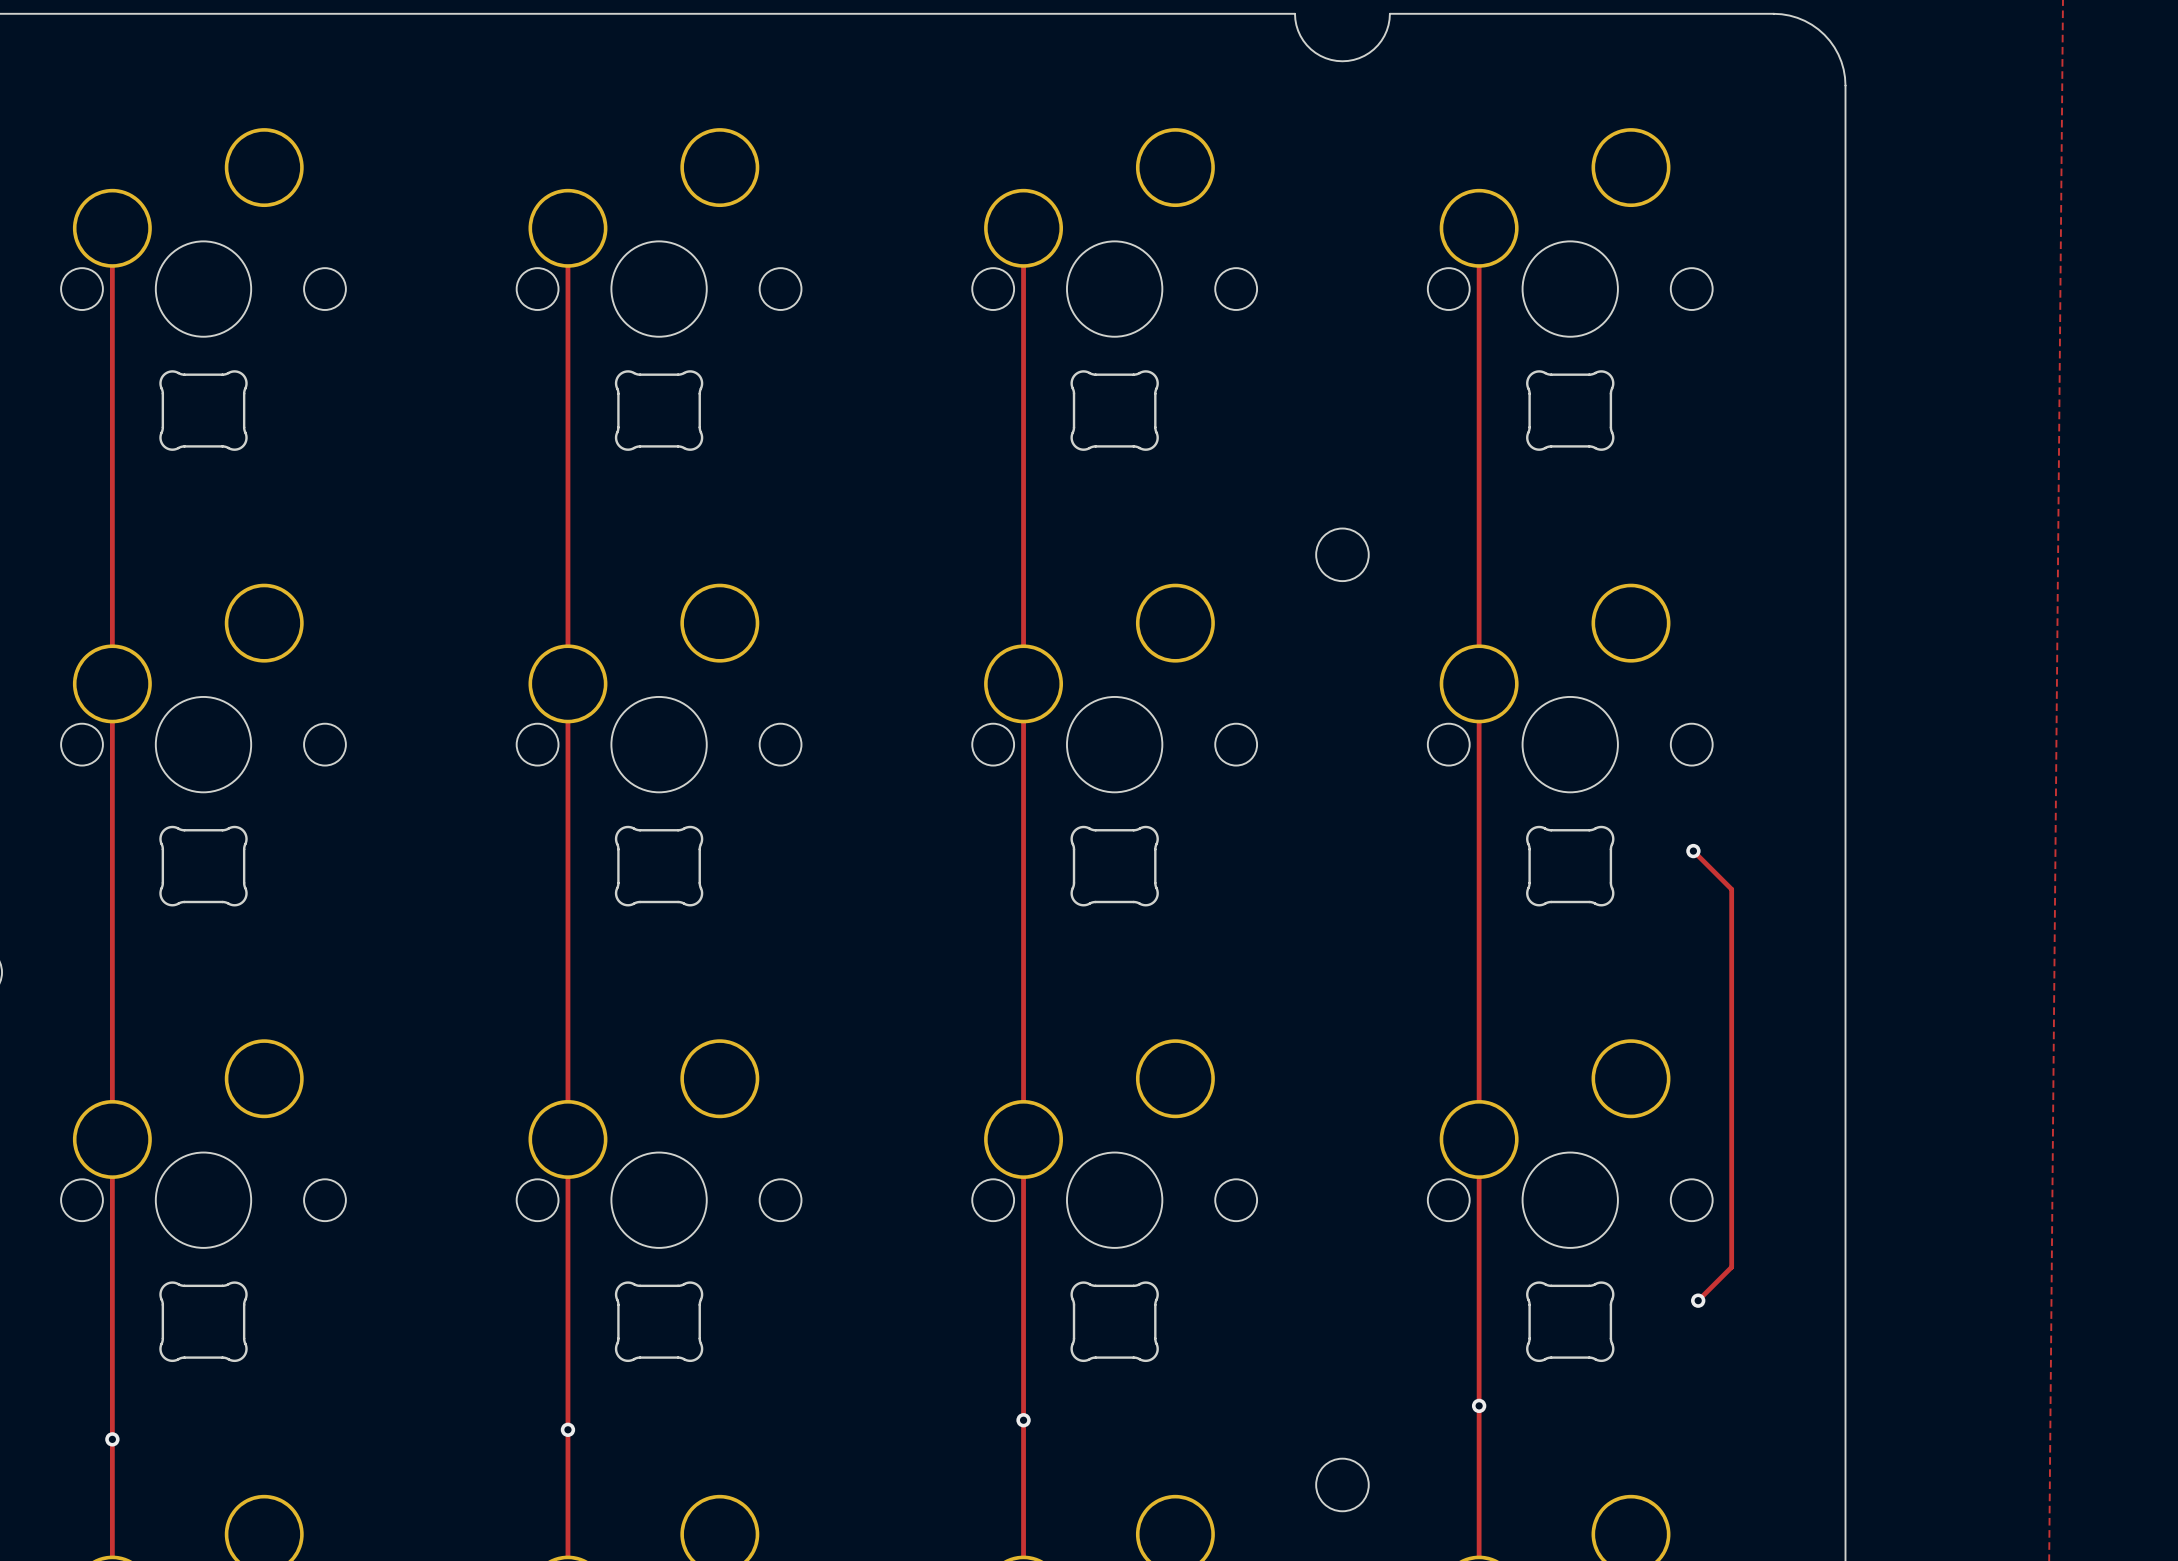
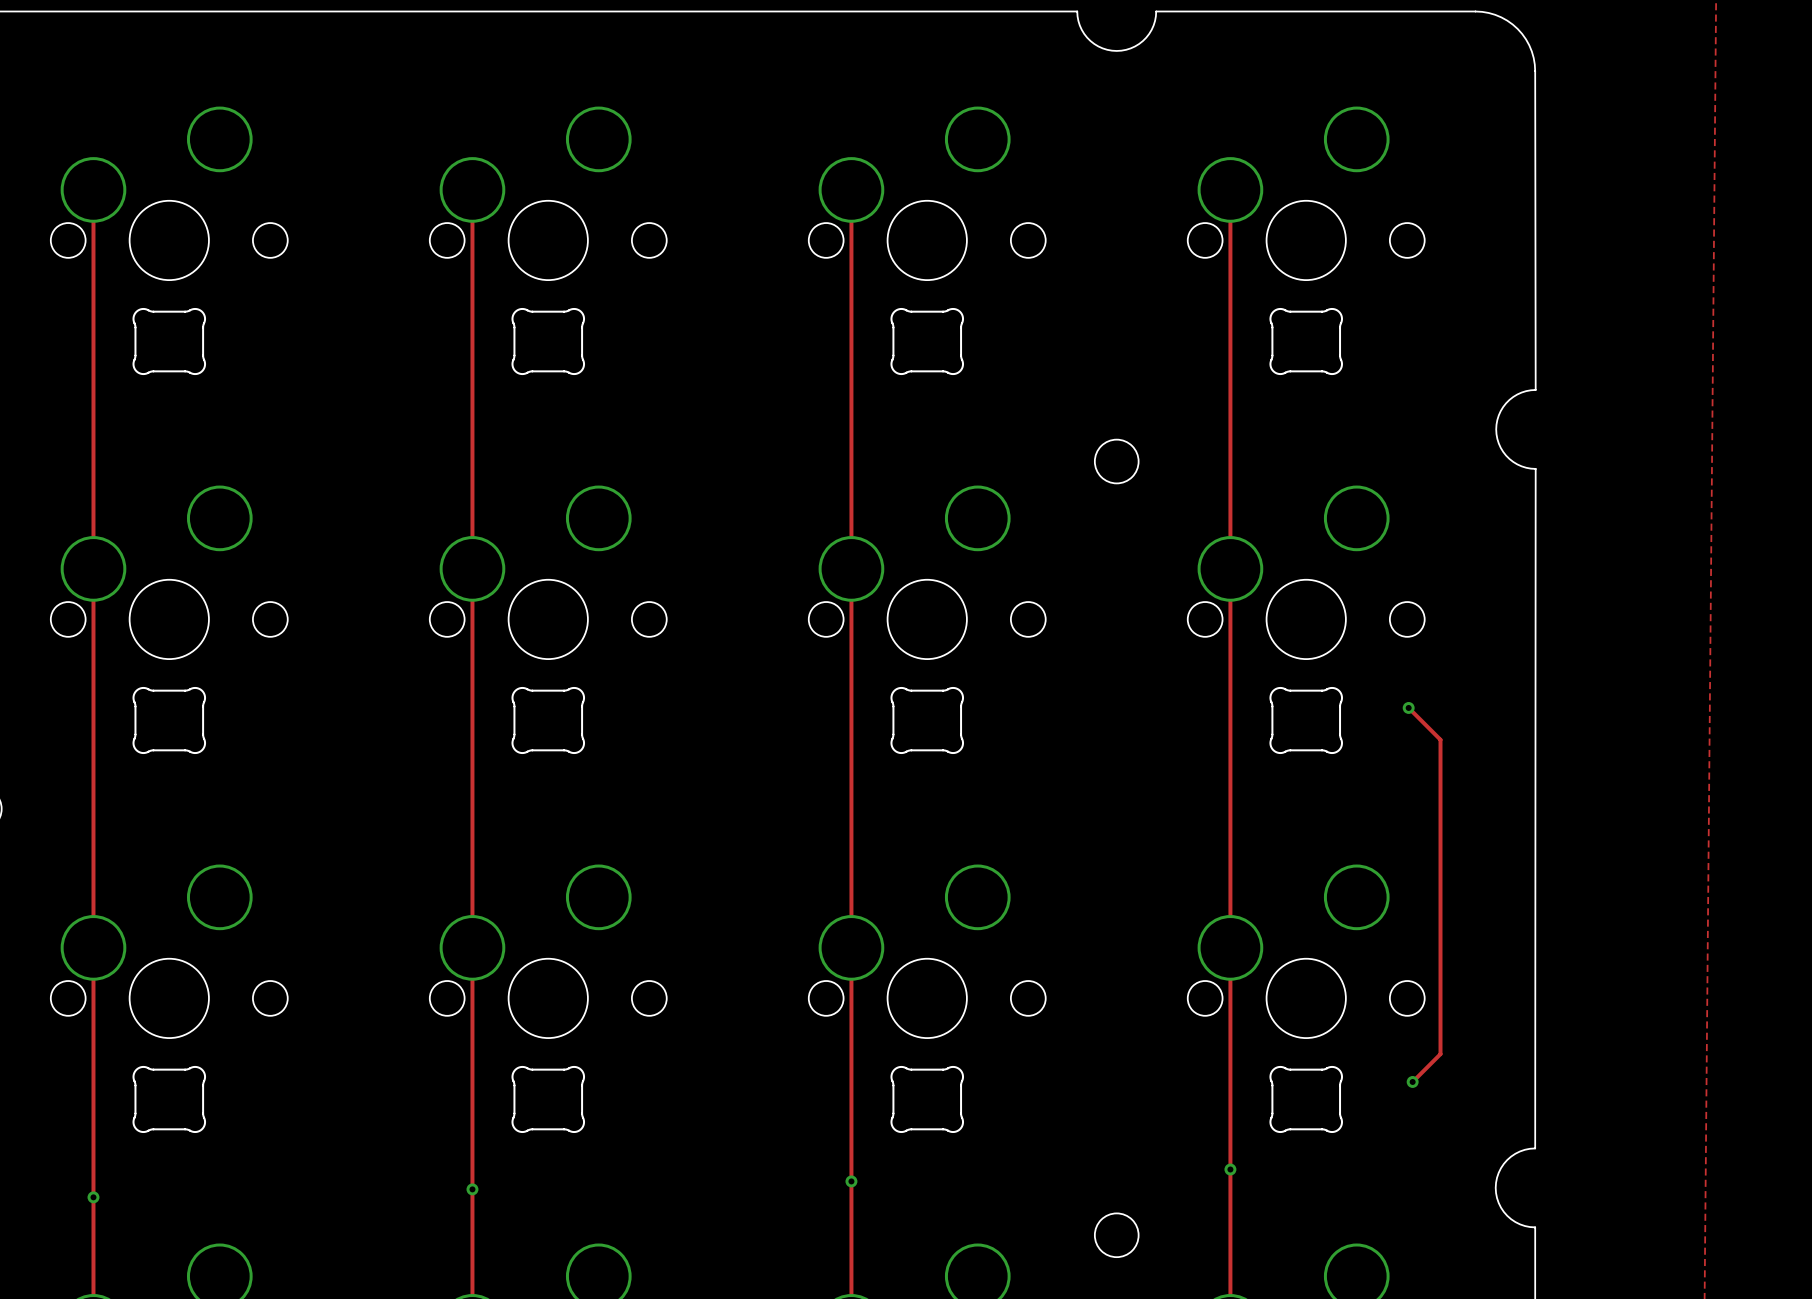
board edge: (1845, 85) (1845, 1475) -> (1535, 71) (1535, 389) (1521, 392) (1509, 399) (1498, 415) (1496, 429) (1498, 443) (1506, 455) (1517, 464) (1535, 468) (1535, 1148) (1520, 1151) (1507, 1159) (1498, 1172) (1495, 1187) (1498, 1203) (1507, 1215) (1520, 1224) (1535, 1227)

